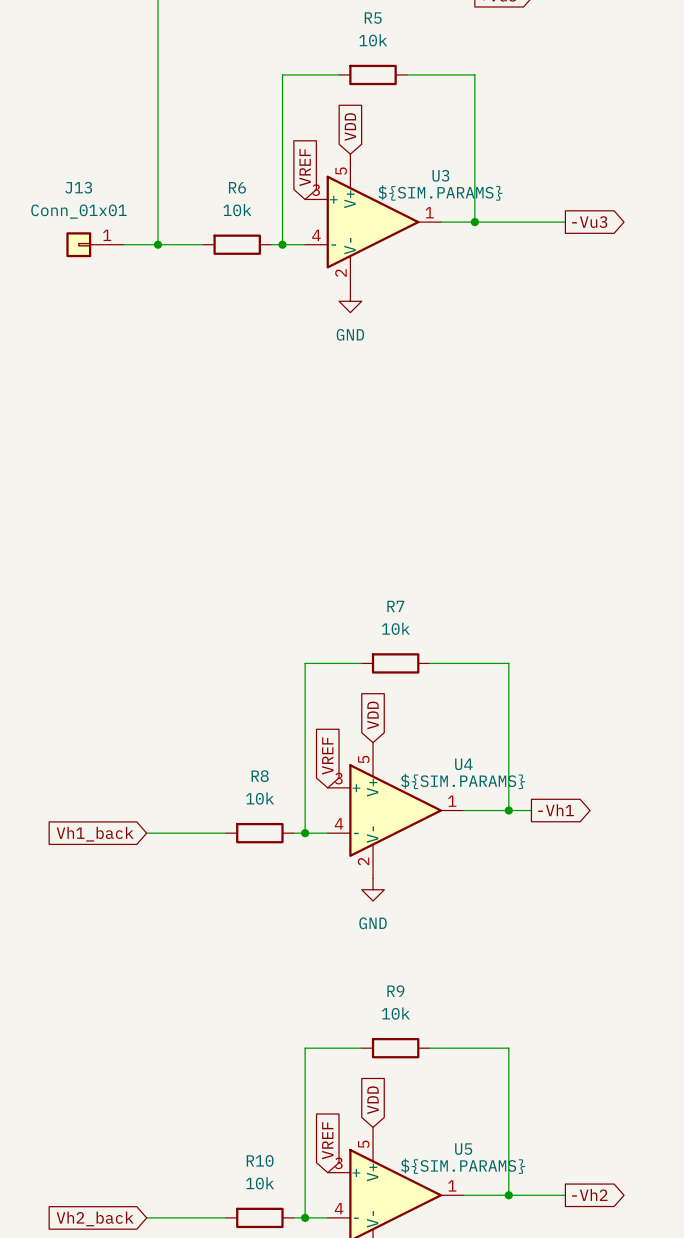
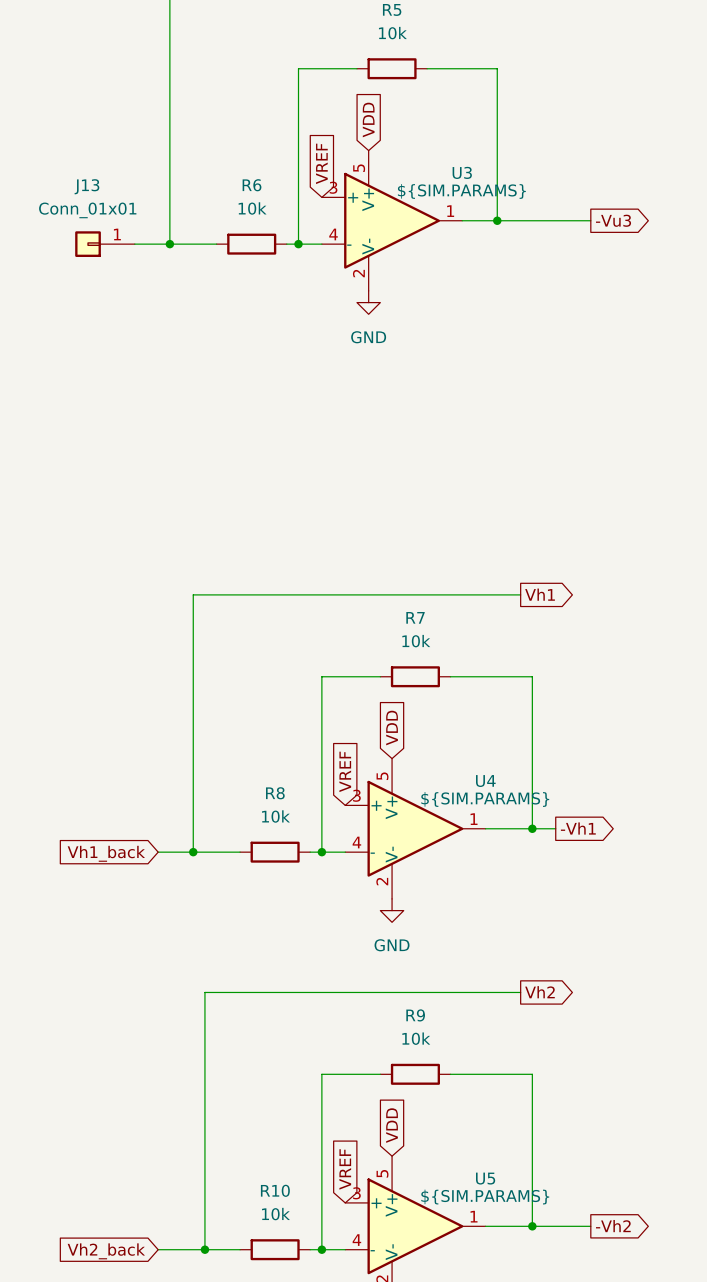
global label: none -> Vh1 (540, 594)
wire: none -> (520, 594) (193, 594) (193, 852)
junction: none -> (193, 852)
wire: none -> (520, 992) (204, 992) (204, 1249)
global label: none -> Vh2 (539, 992)
junction: none -> (204, 1249)

